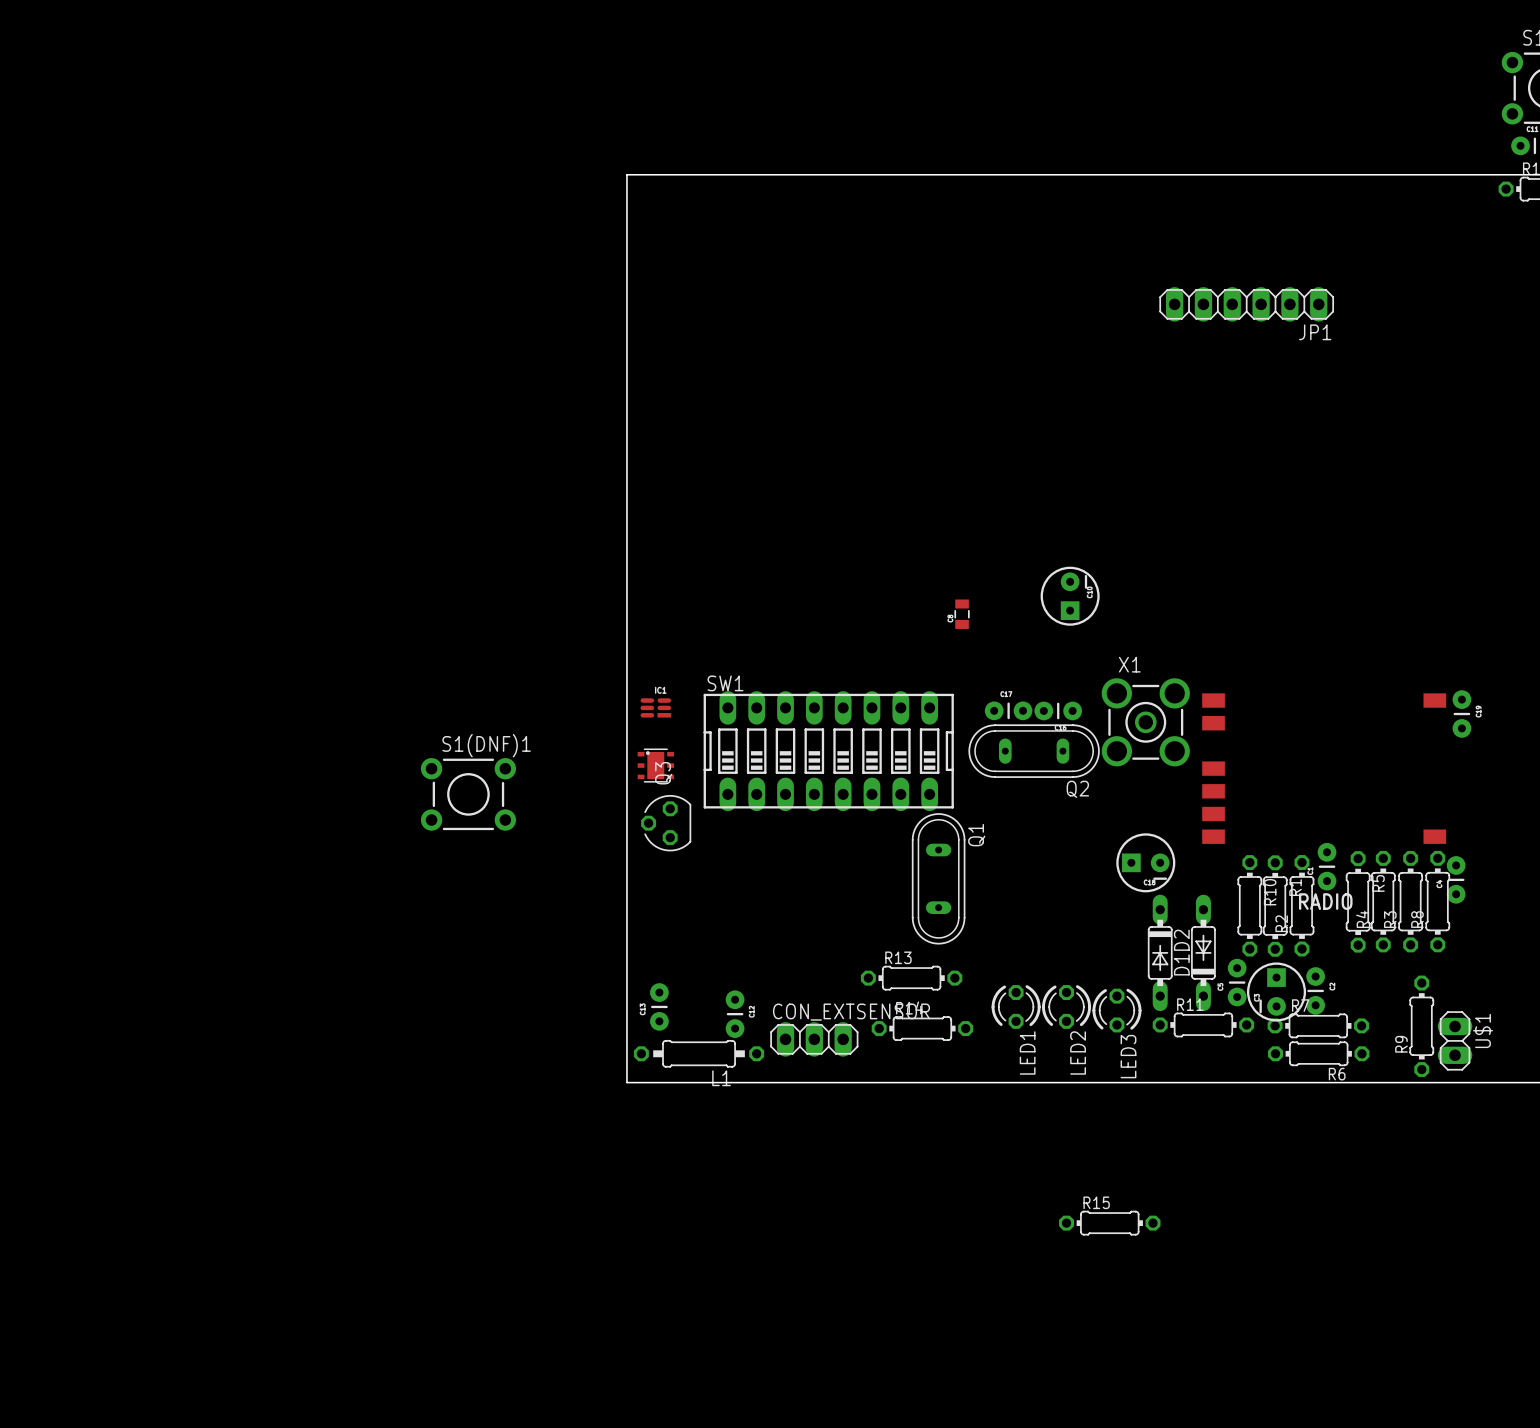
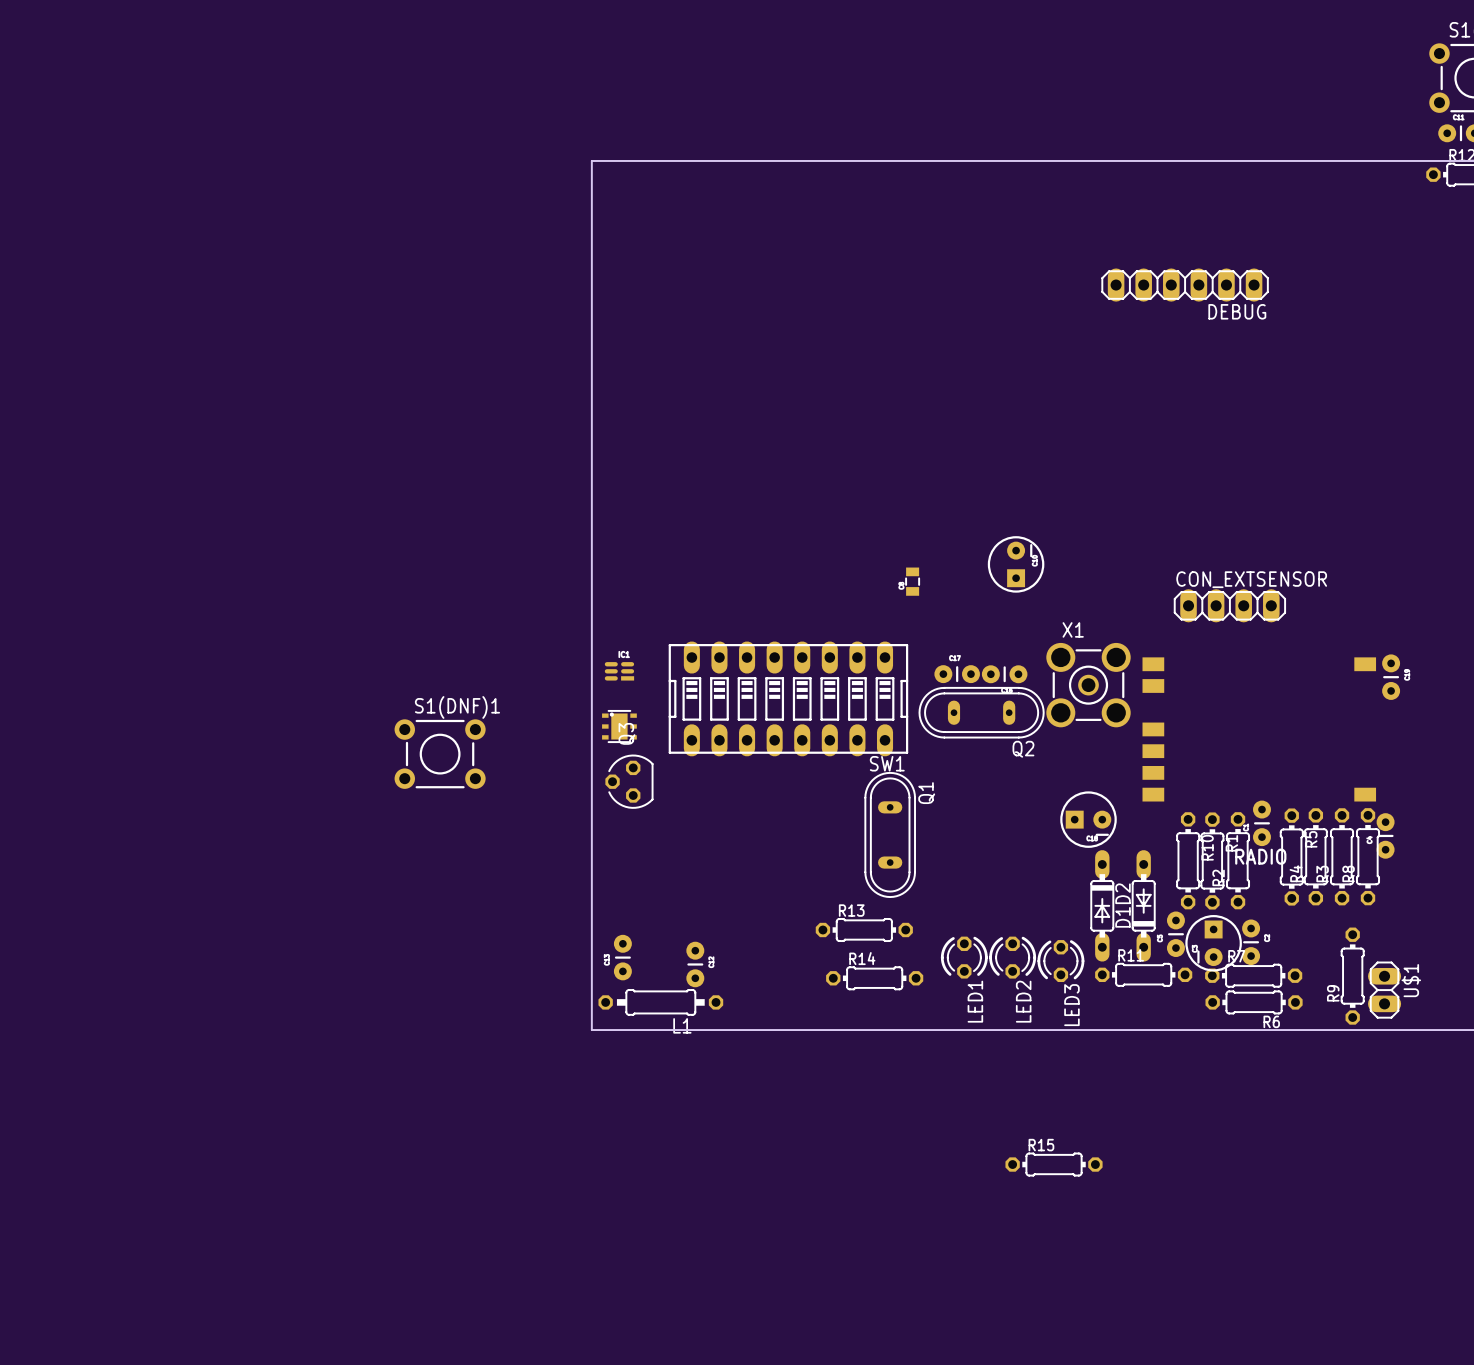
JP1 name: JP1 (1315, 332) -> DEBUG (1237, 311)
CON_EXTSENSOR: none -> (1229, 605)
SW1 rotation: 0° (828, 751) -> 180° (788, 698)
CON_EXTSENSOR: (814, 1039) -> none

